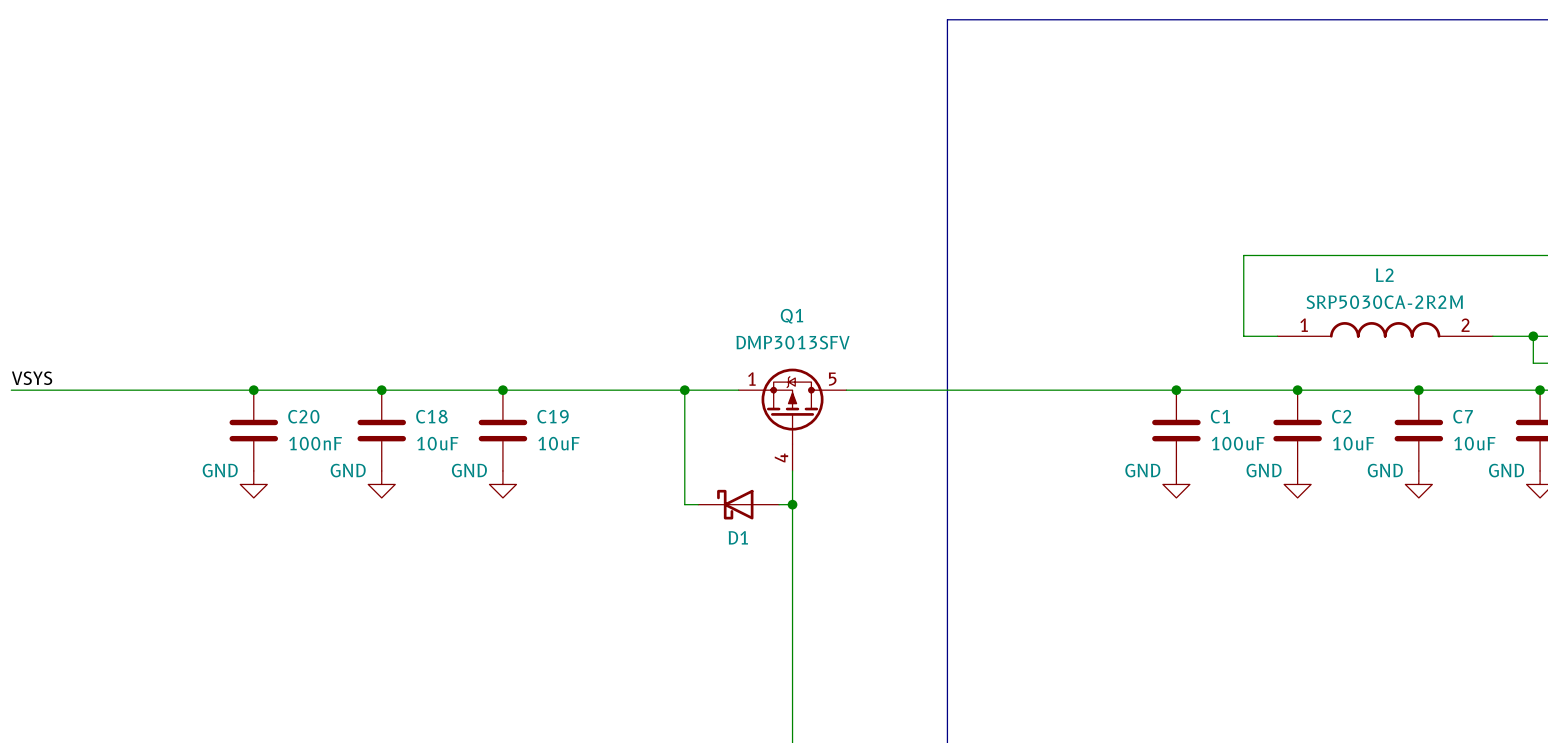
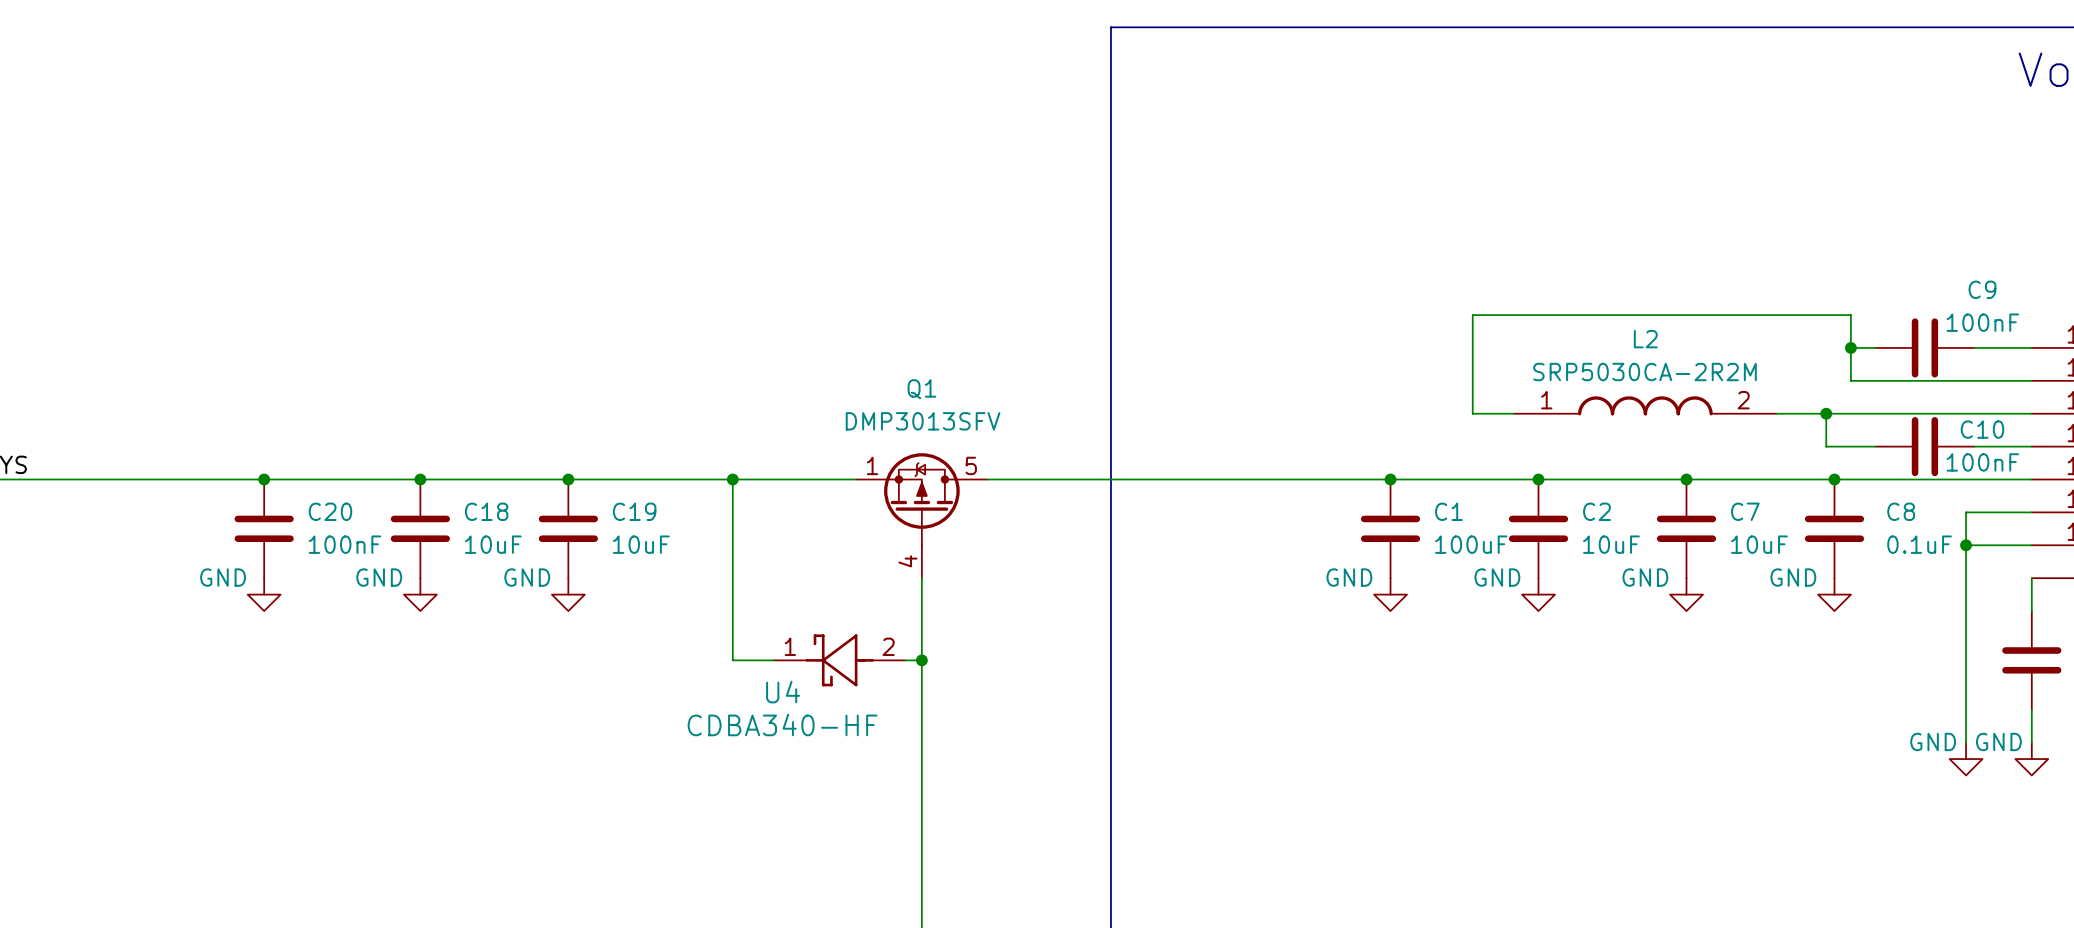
wire: none -> (732, 479) (732, 660) (773, 660)
wire: (684, 390) (684, 504) (698, 504) -> none
junction position: (684, 390) -> (732, 479)
D1: (738, 504) -> none
wire: (779, 504) (792, 504) -> (905, 660) (921, 660)
junction position: (792, 504) -> (921, 660)
U4: none -> CDBA340-HF (839, 660)

